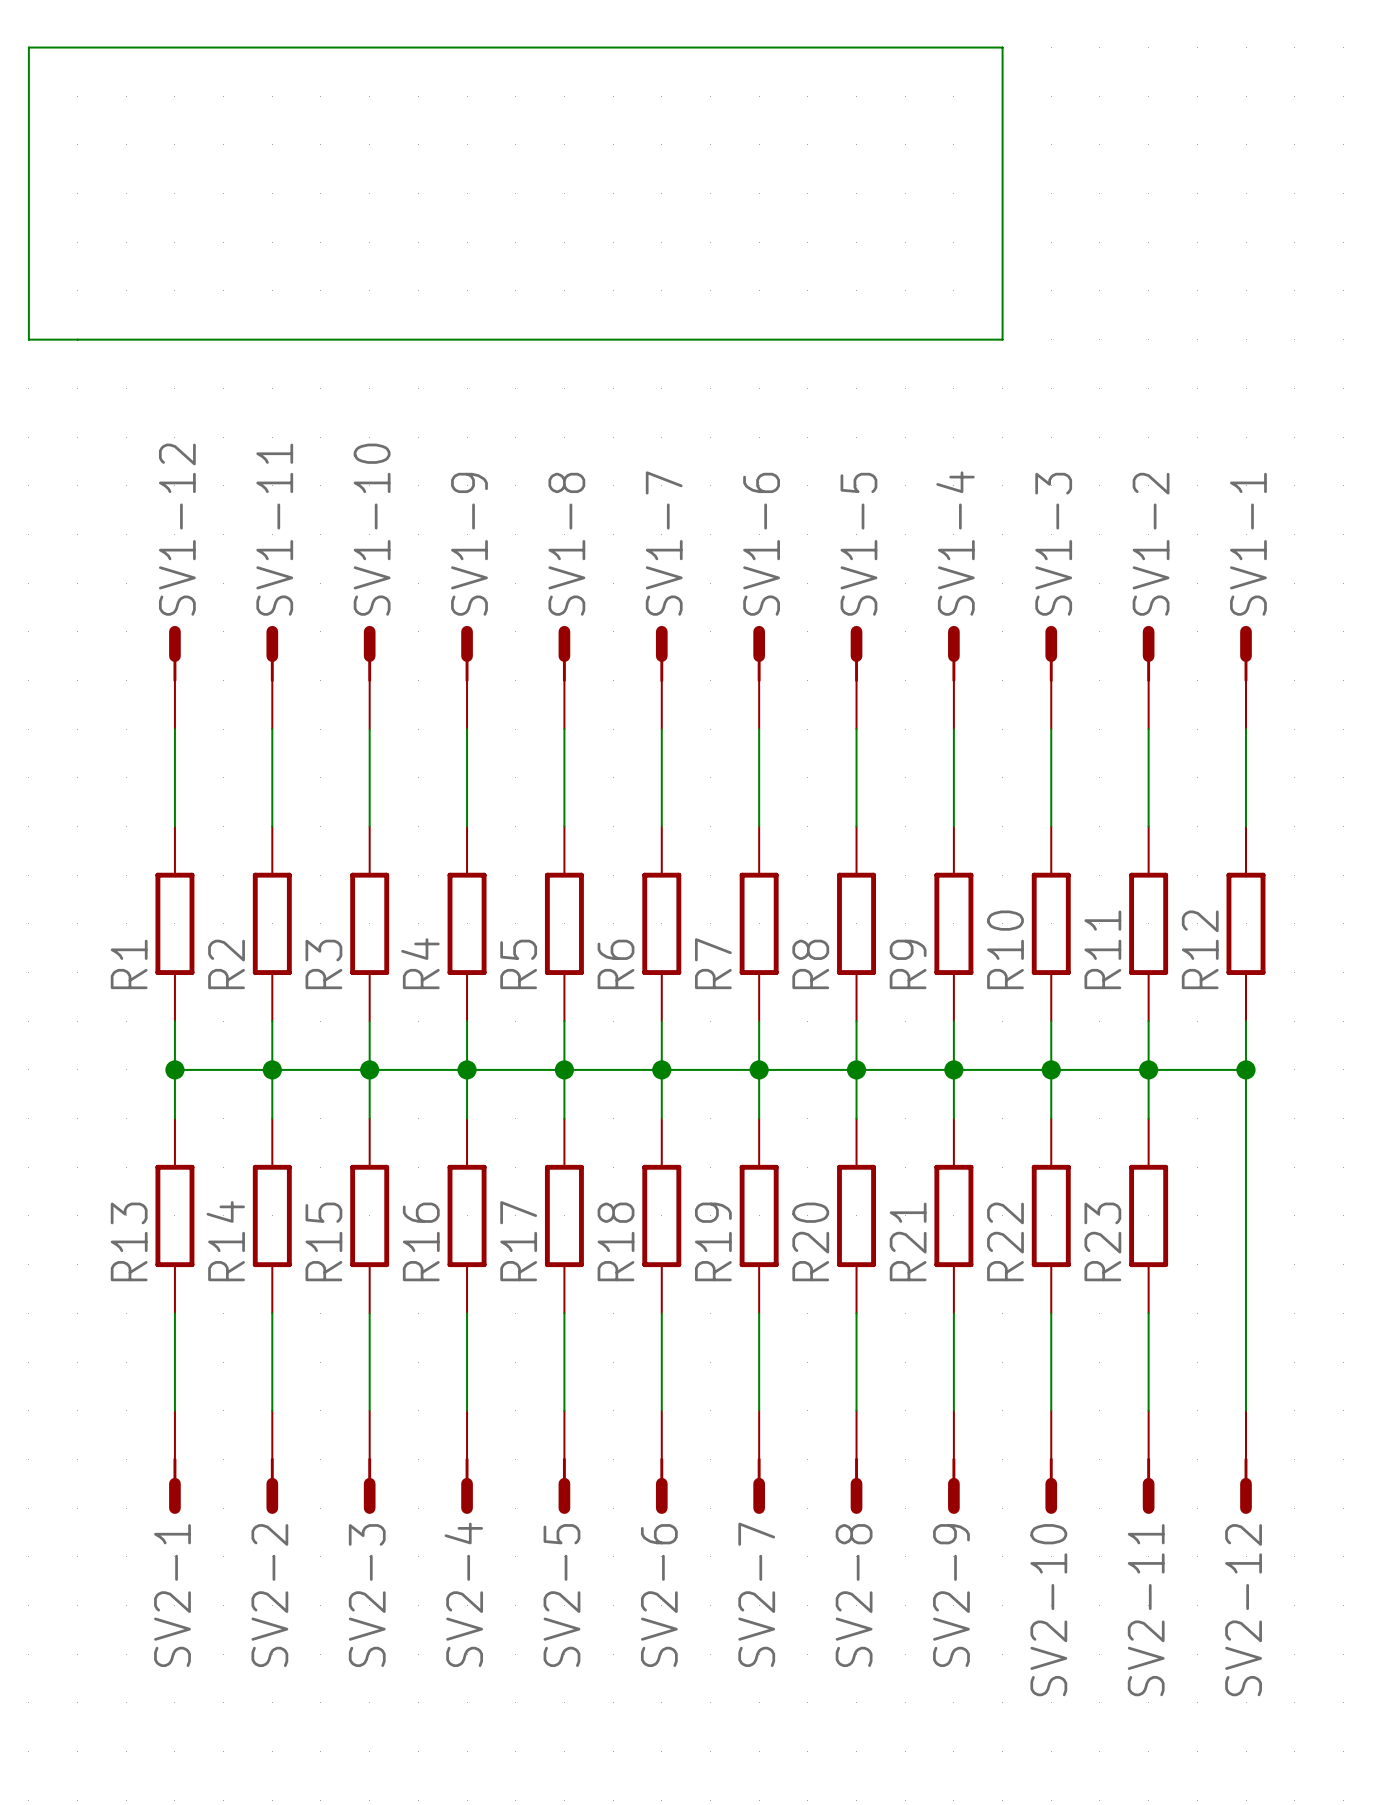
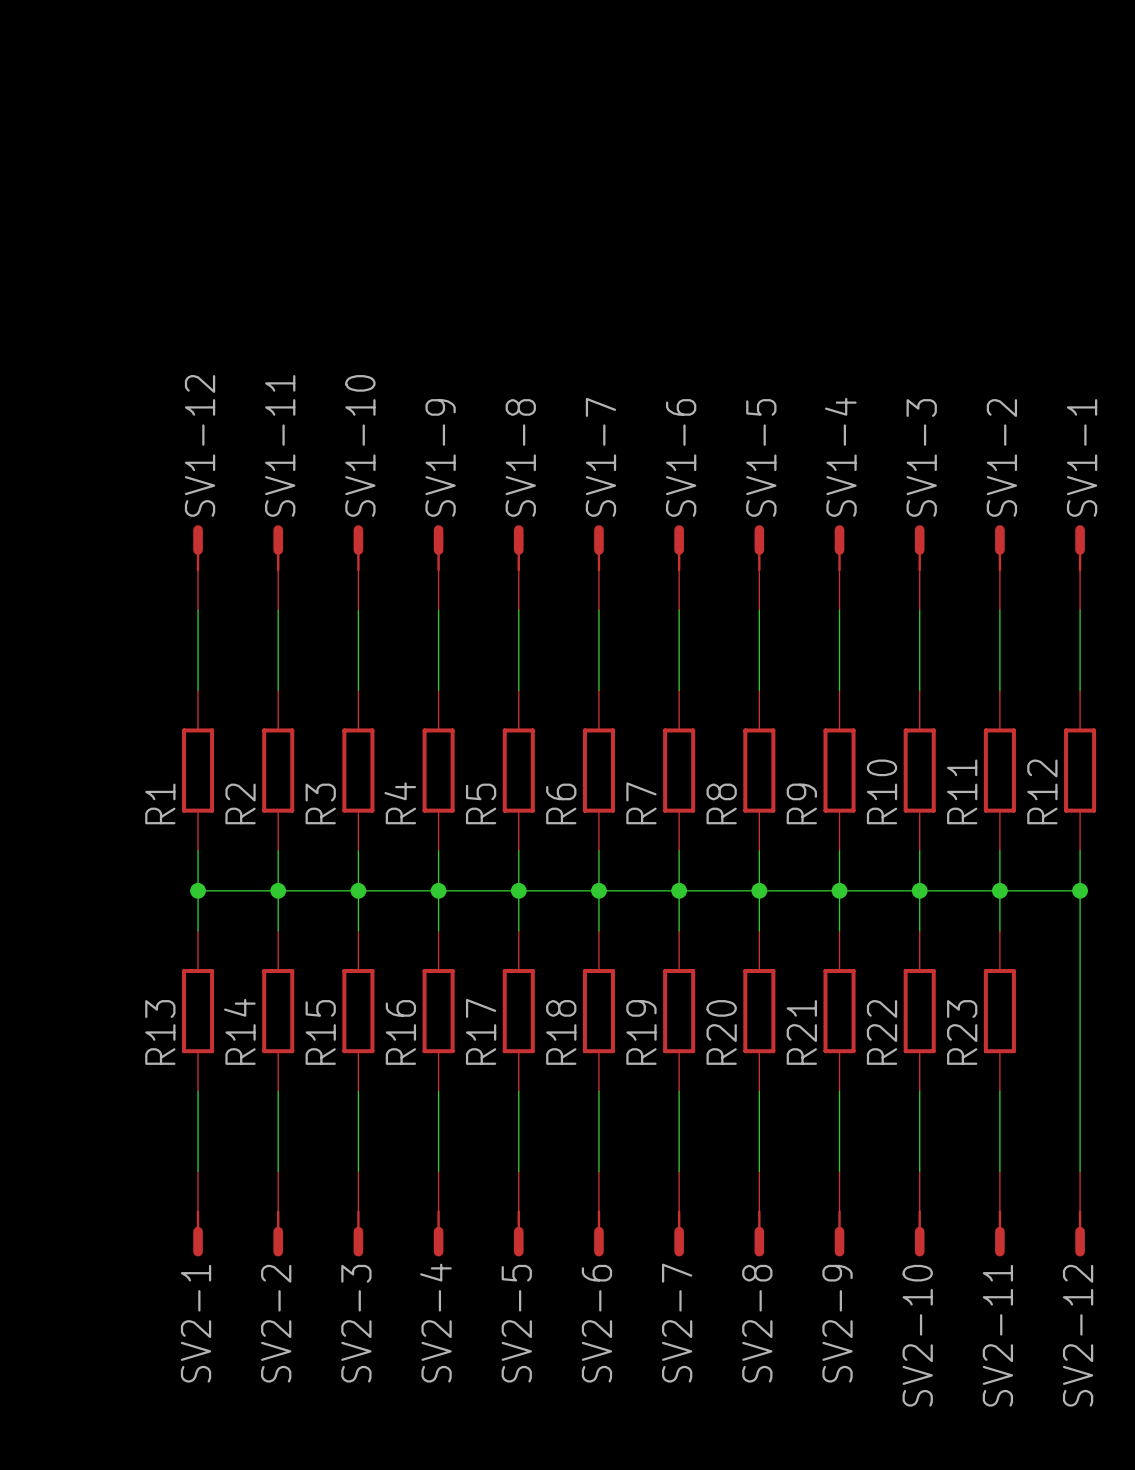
wire: (28, 47) (1002, 47) (1002, 339) (28, 339) (28, 47) -> none

